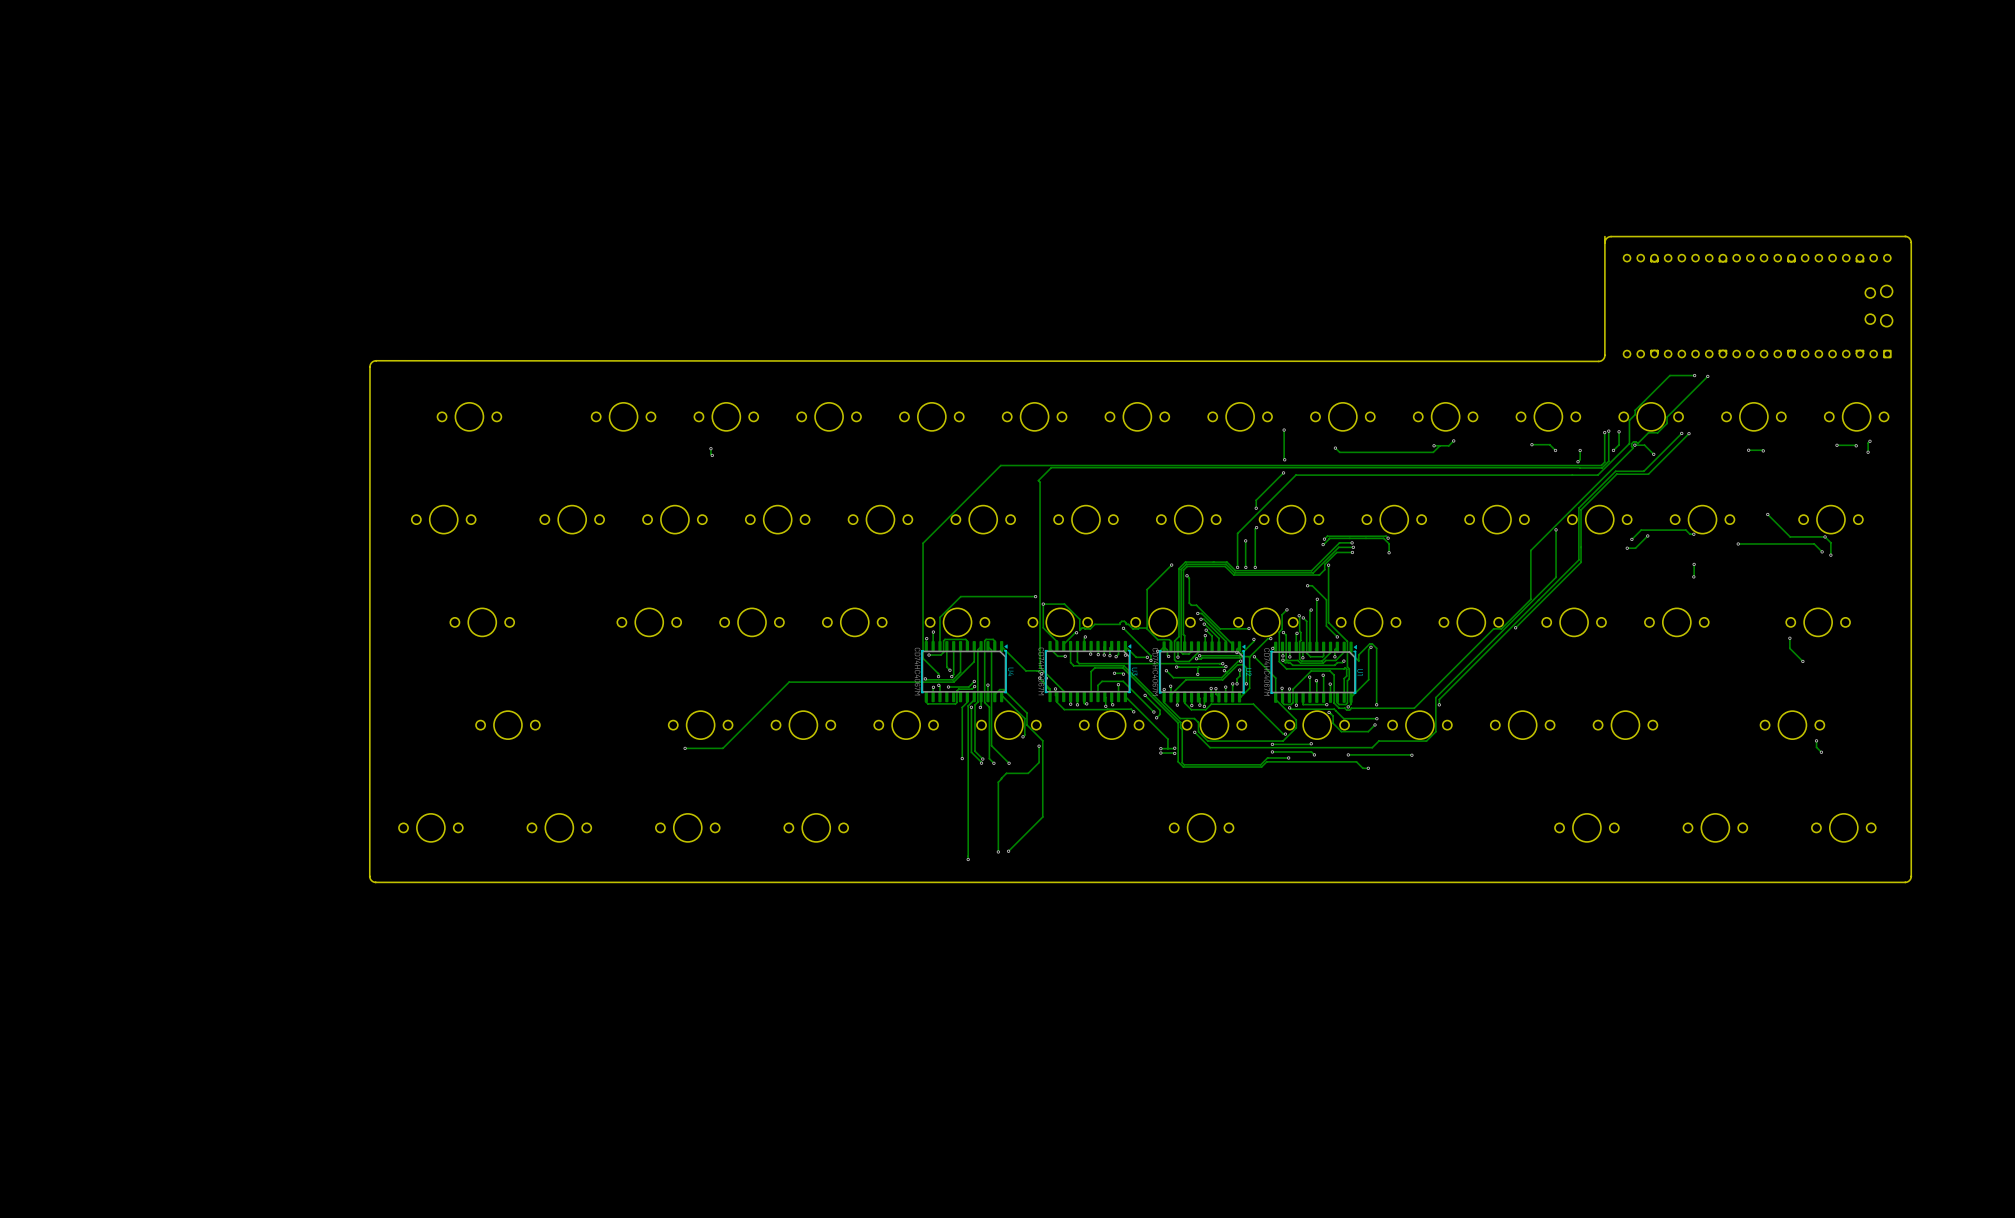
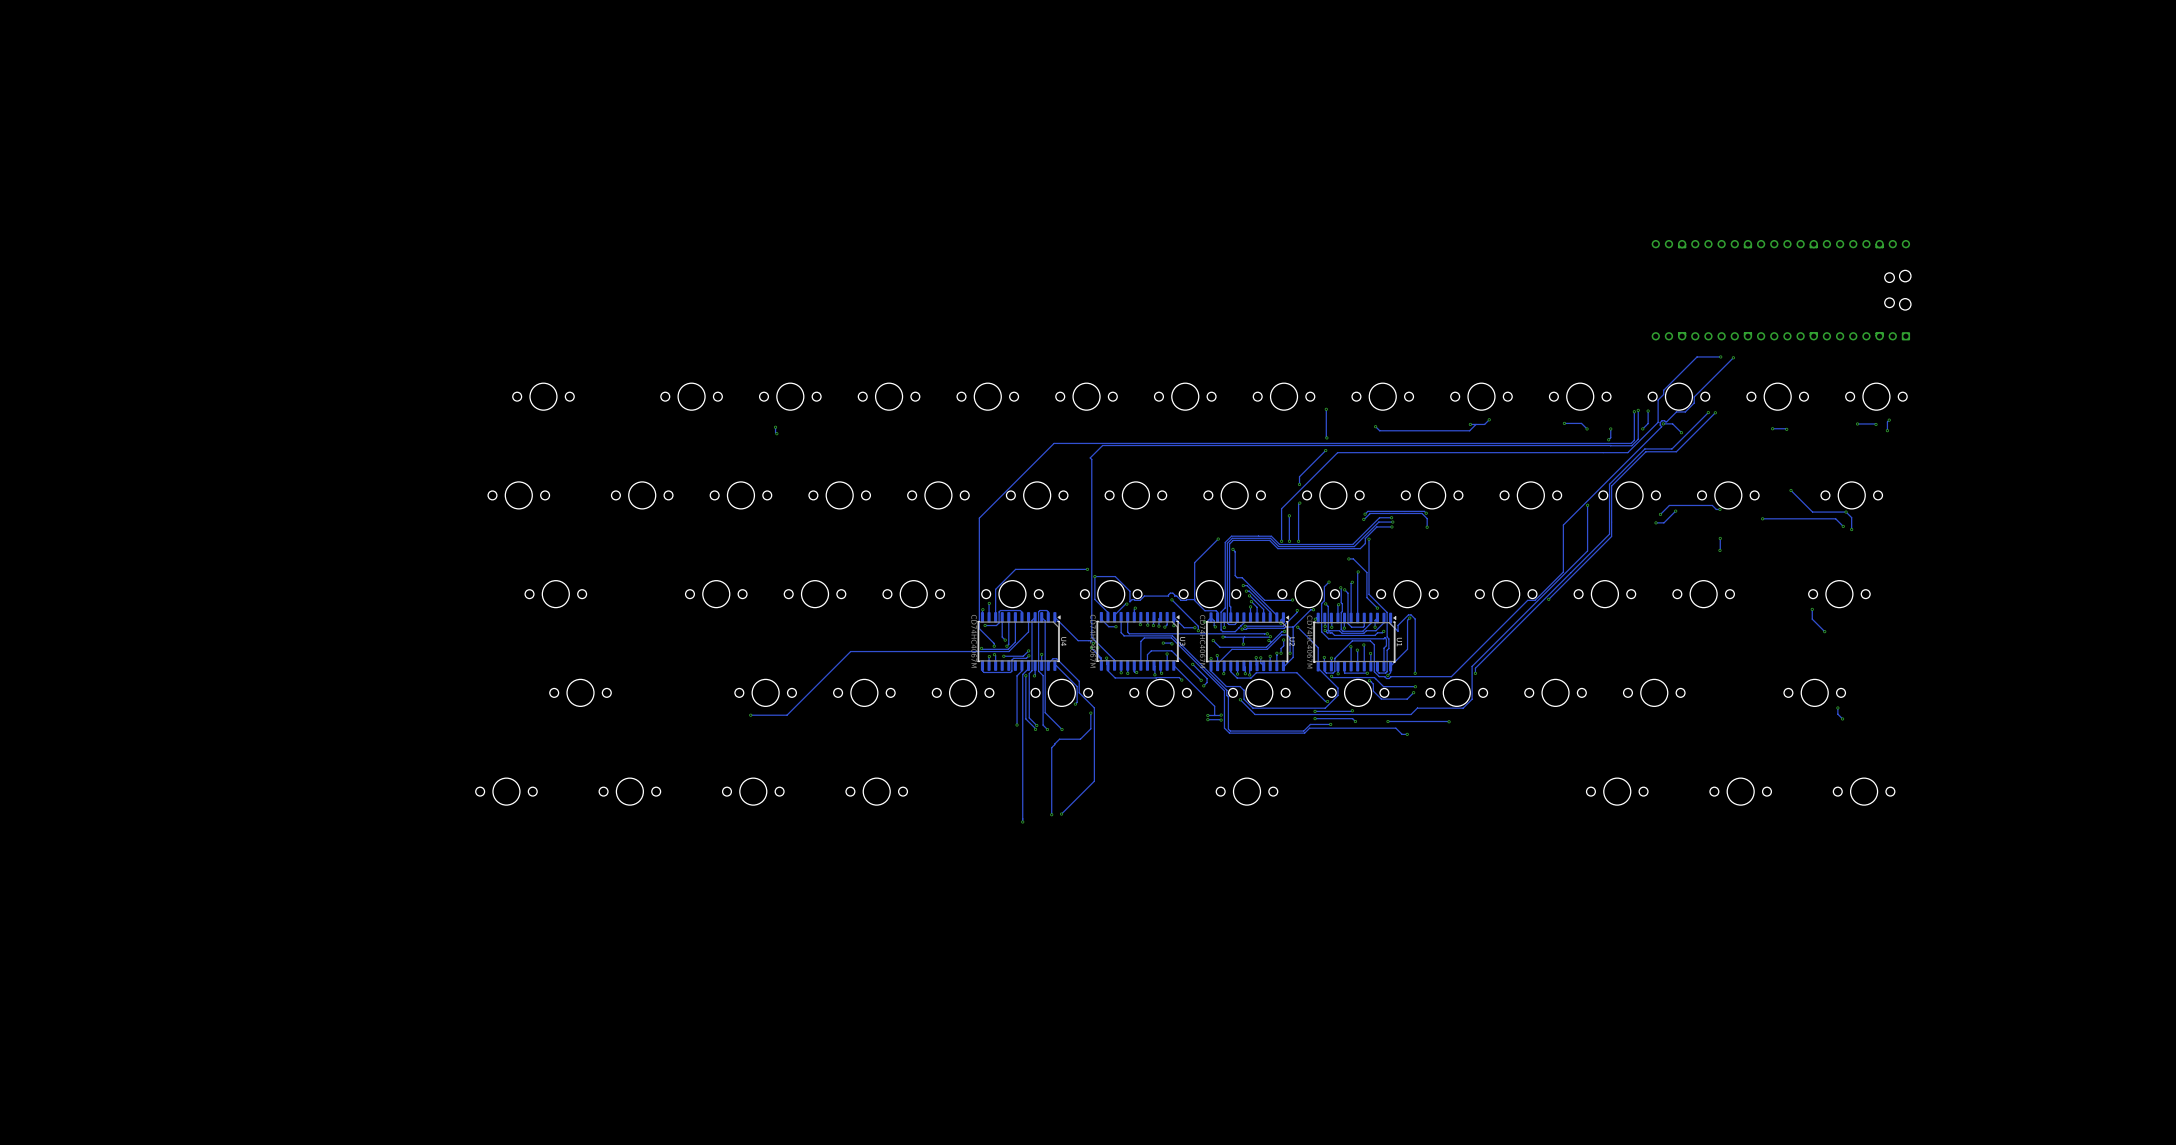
board edge: (1604, 236) (1604, 355) (1603, 359) (1599, 361) (373, 361) (369, 366) (369, 876) -> none
board edge: (1905, 236) (1909, 238) (1911, 242) -> none
board edge: (1905, 236) (1611, 236) (1606, 238) (1604, 242) -> none
board edge: (1911, 242) (1911, 876) -> none
board edge: (369, 876) (371, 880) (375, 882) -> none
board edge: (1911, 876) (1909, 880) (1905, 882) -> none
board edge: (1905, 882) (375, 882) -> none

